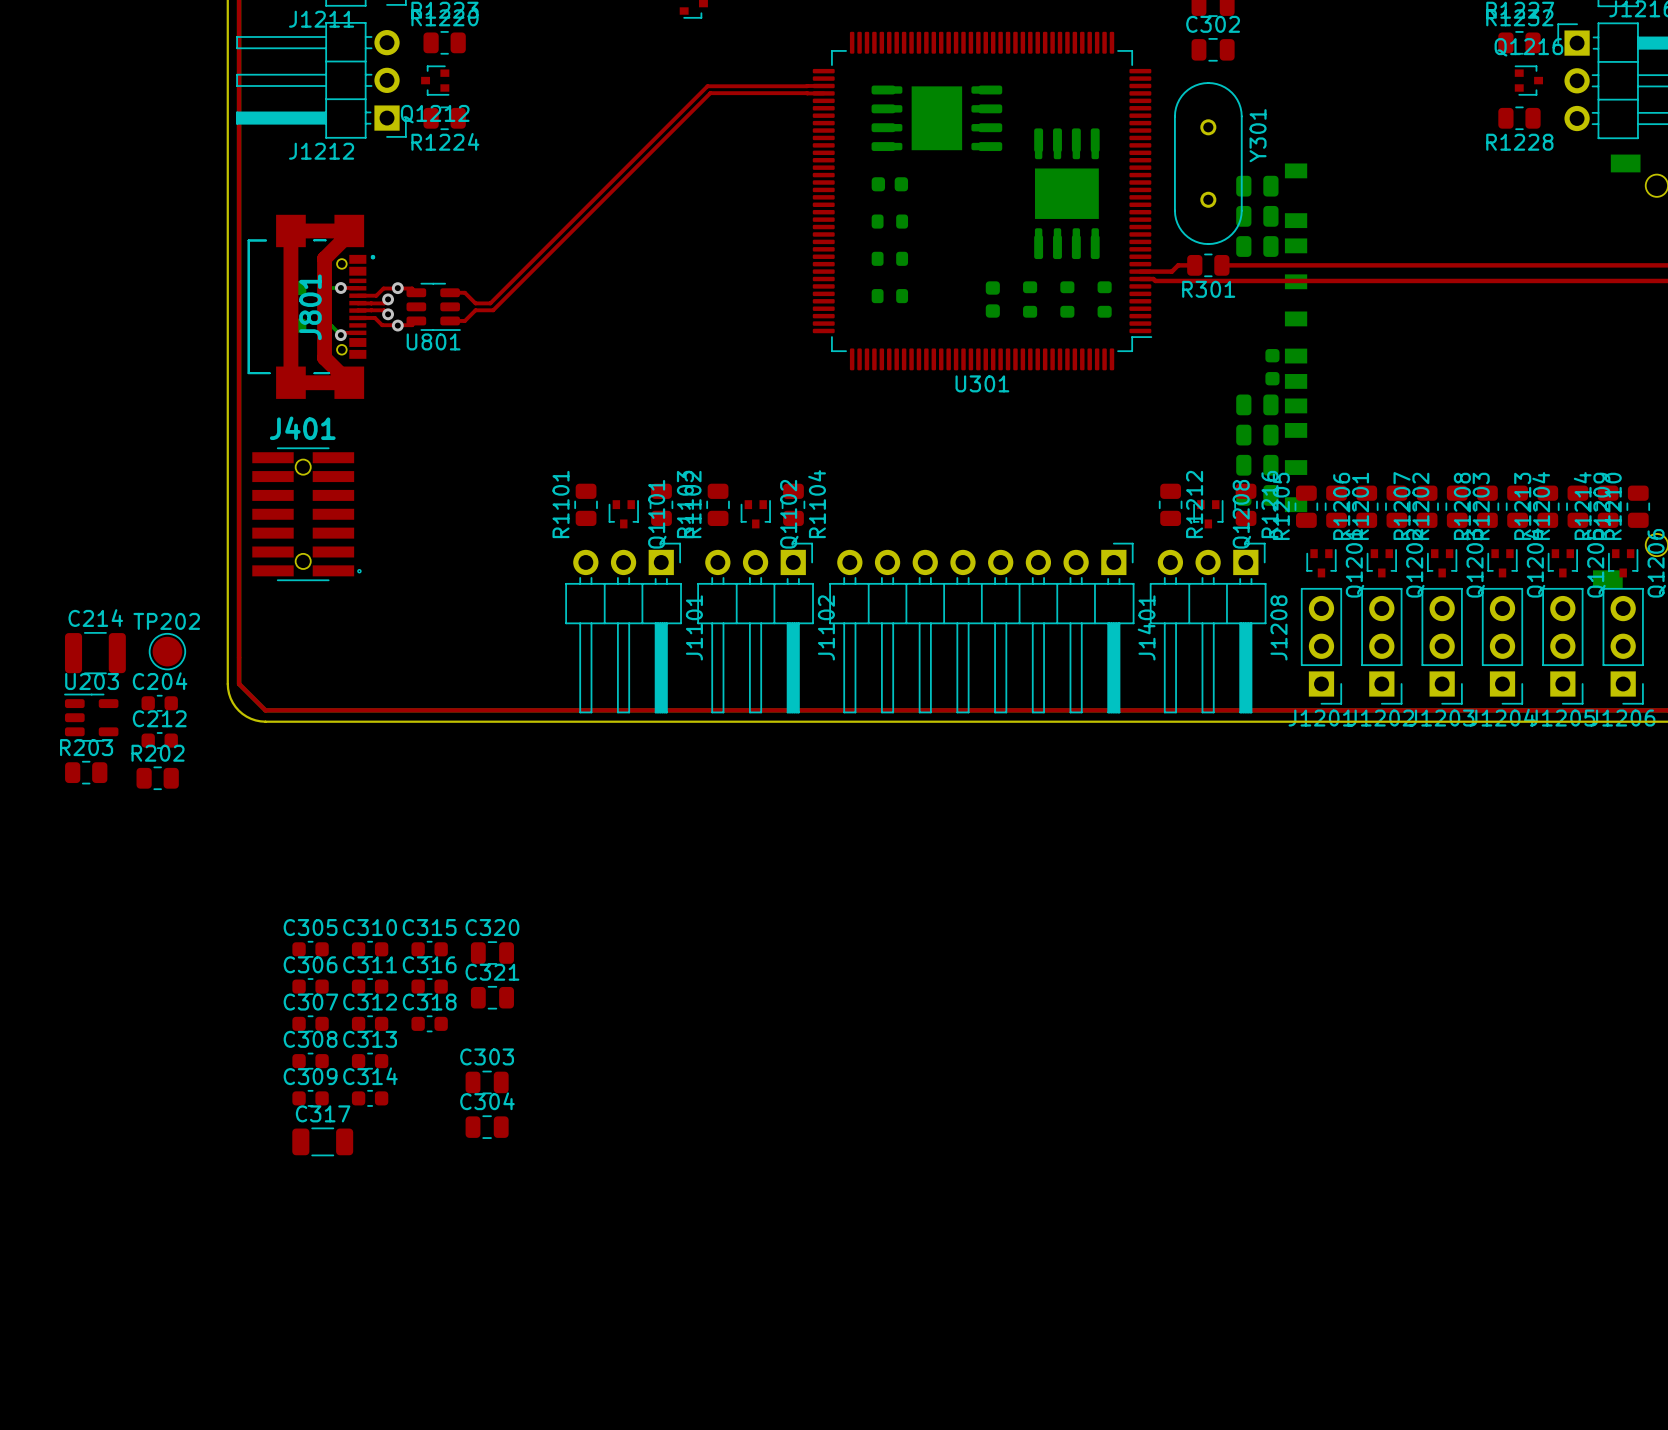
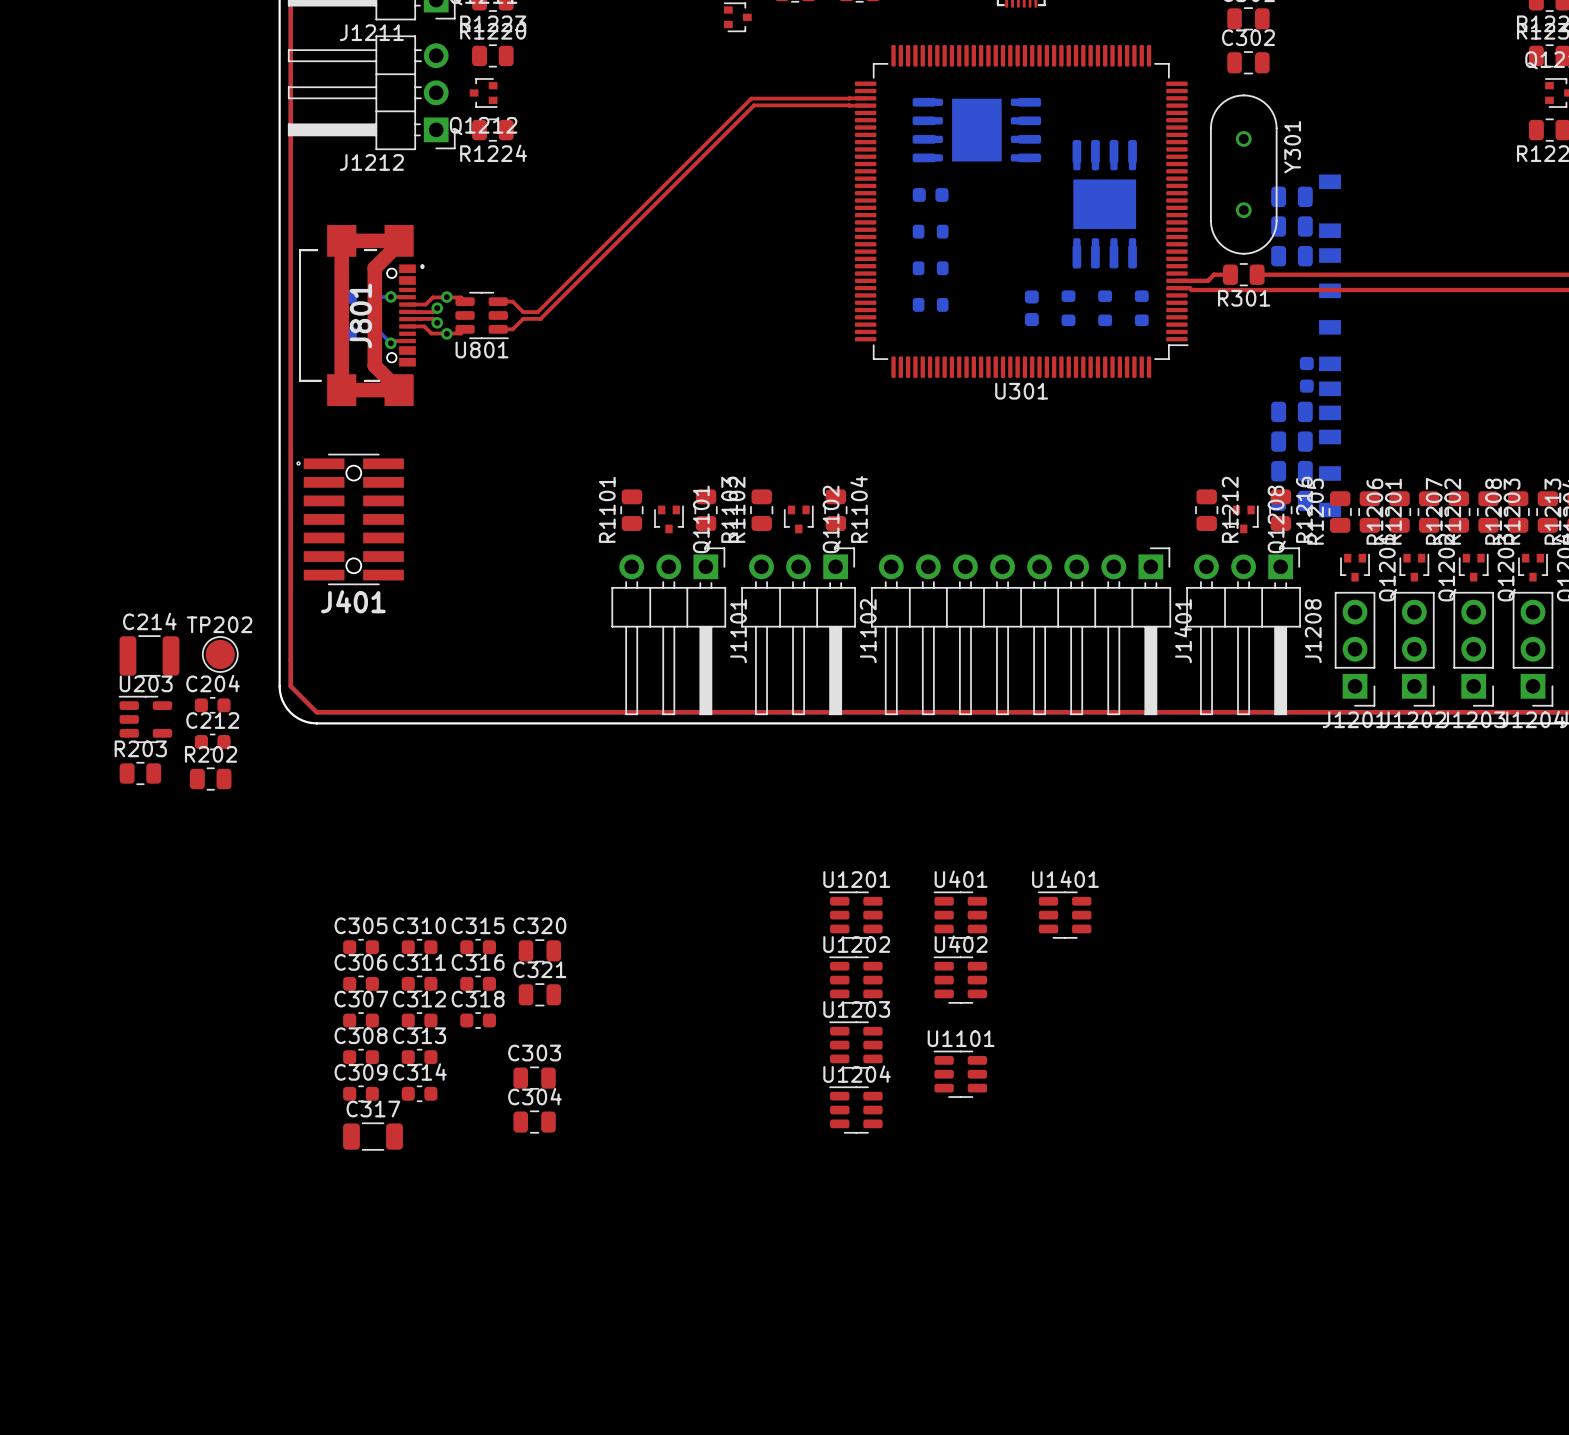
J401 rotation: 0° (306, 514) -> 180° (350, 519)
U1201: none -> (855, 915)
U401: none -> (960, 915)
U1401: none -> (1064, 915)
U1202: none -> (855, 980)
U402: none -> (960, 980)
U1203: none -> (855, 1045)
U1101: none -> (960, 1074)
U1204: none -> (855, 1110)

